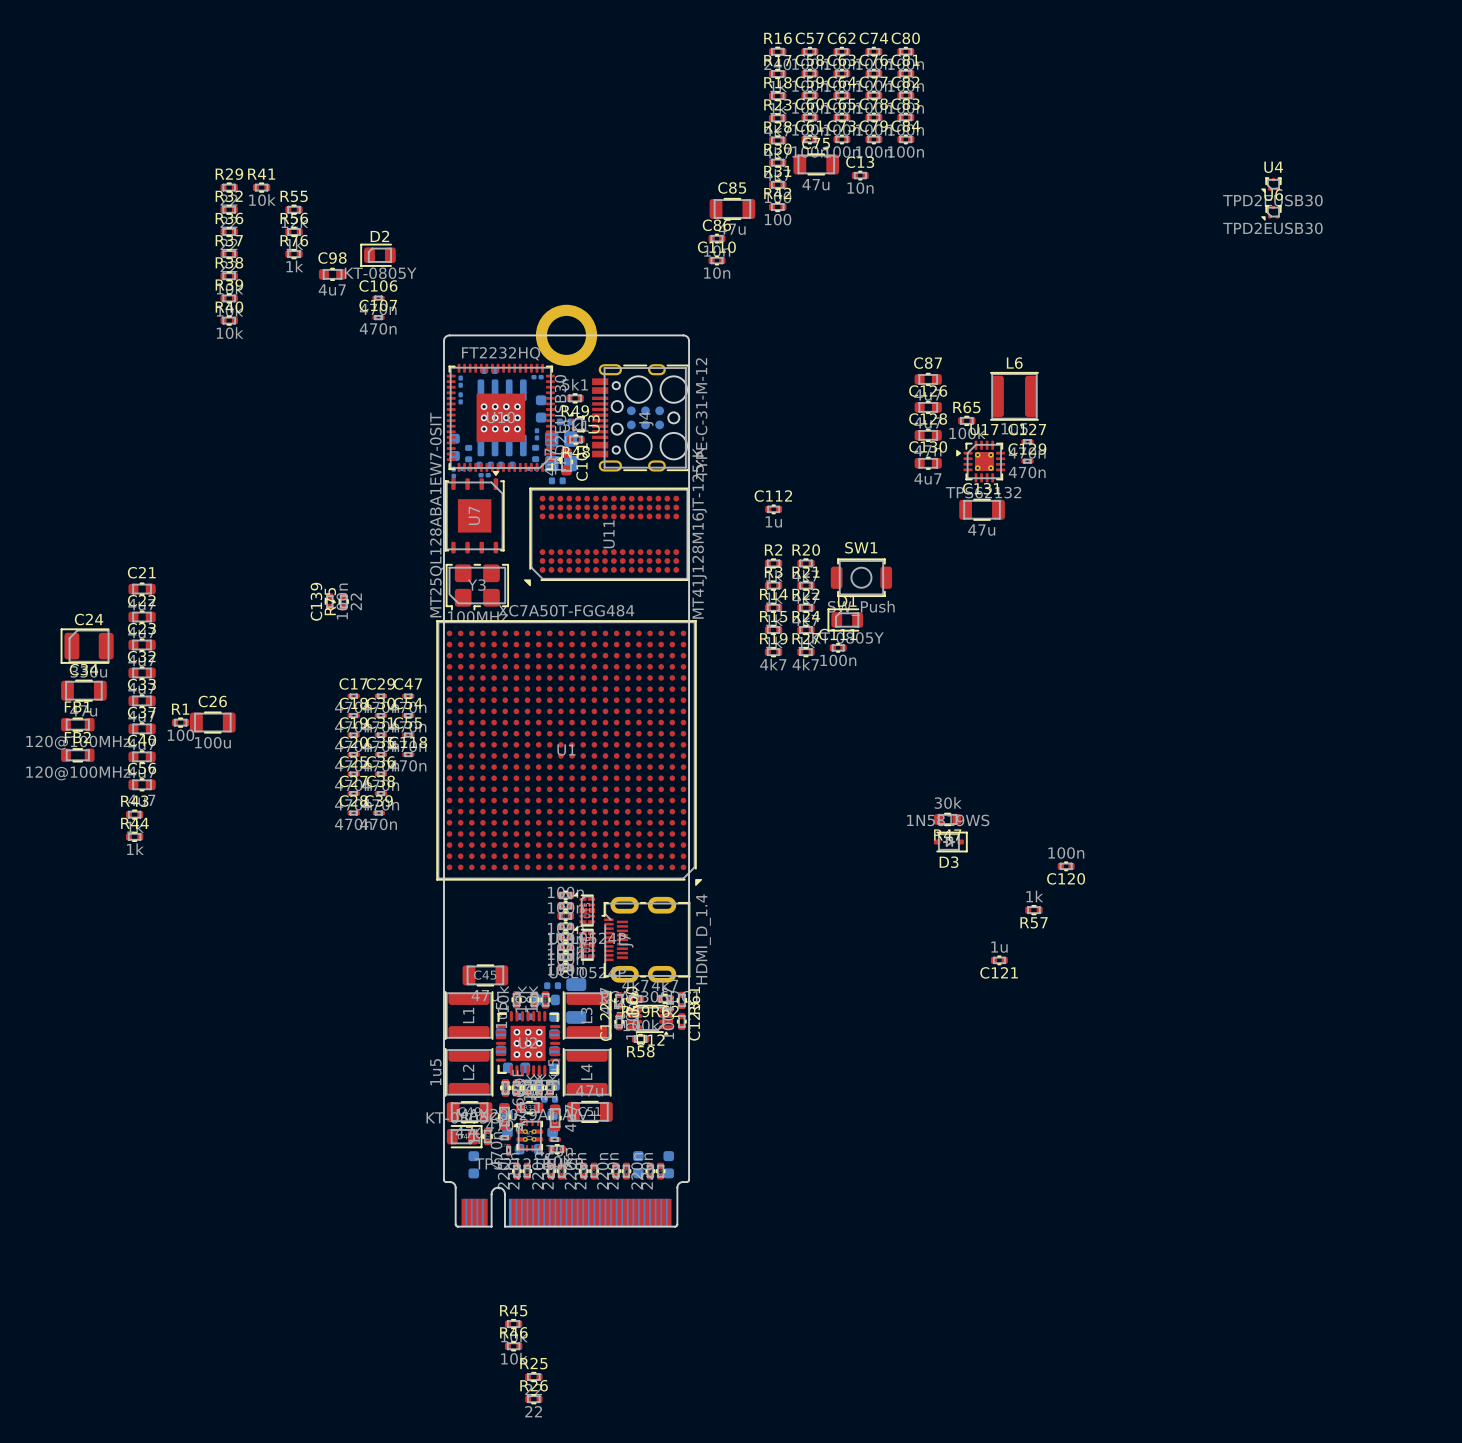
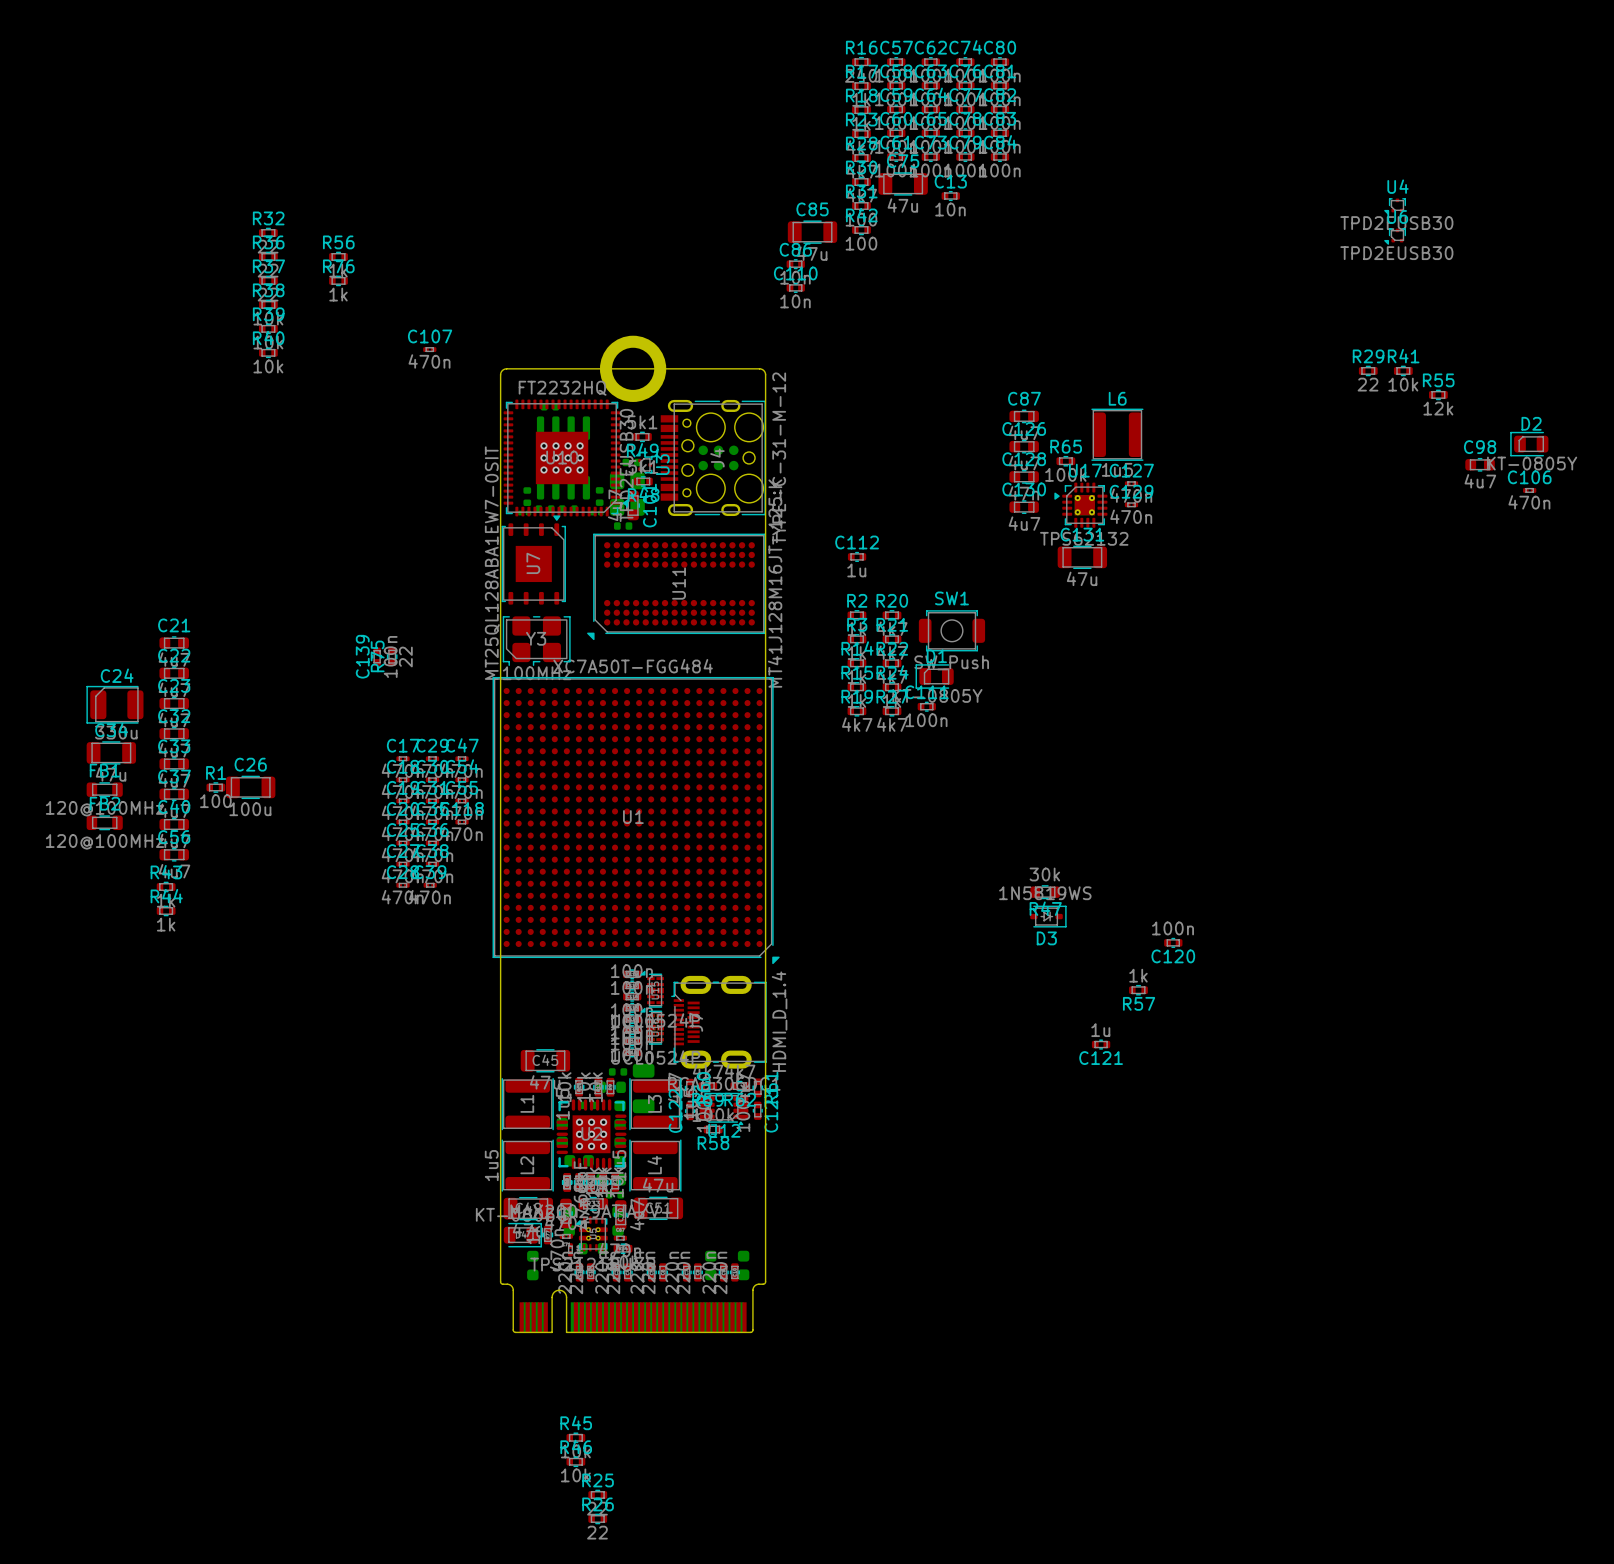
R29 position: (229, 187) -> (1368, 370)
R41 position: (261, 187) -> (1403, 370)
R55 position: (294, 209) -> (1438, 394)
D2 position: (378, 255) -> (1529, 444)
C98 position: (332, 274) -> (1480, 464)
C106 position: (378, 298) -> (1529, 490)
part: (537, 377) -> none
part: (460, 381) -> none
part: (460, 398) -> none
part: (541, 408) -> none
part: (537, 434) -> none
part: (454, 447) -> none
part: (453, 472) -> none
part: (484, 475) -> none

